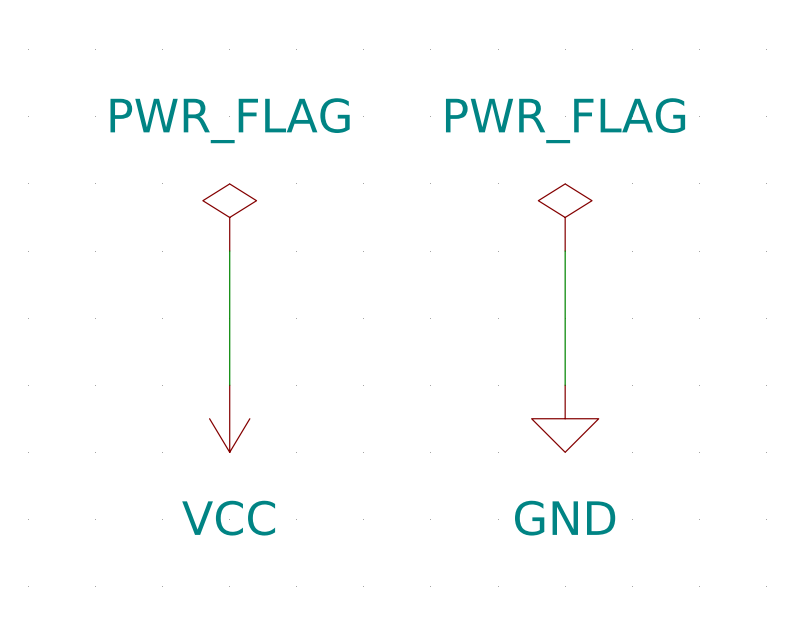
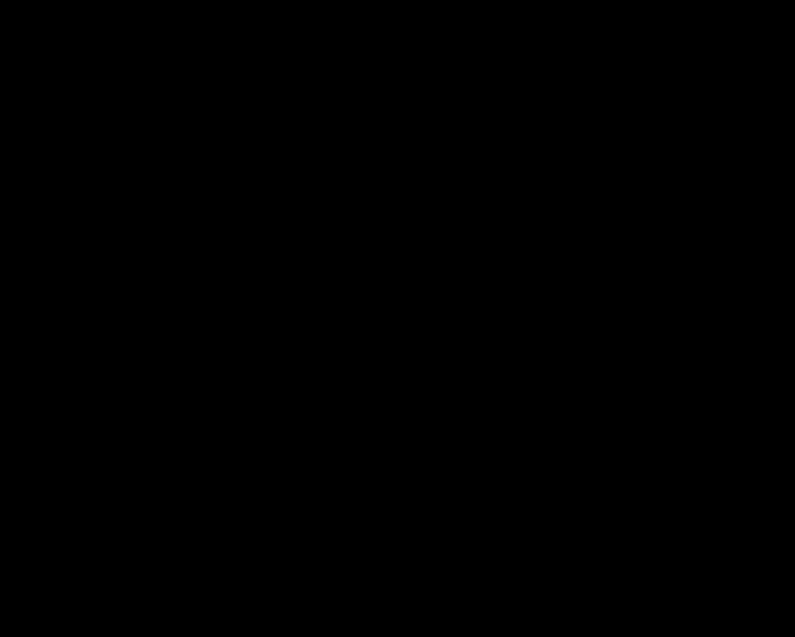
power symbol: PWR_FLAG (229, 217) -> none
power symbol: PWR_FLAG (565, 217) -> none
wire: (229, 251) (229, 385) -> none
wire: (565, 251) (565, 385) -> none
power symbol: VCC (229, 418) -> none
power symbol: GND (565, 418) -> none

